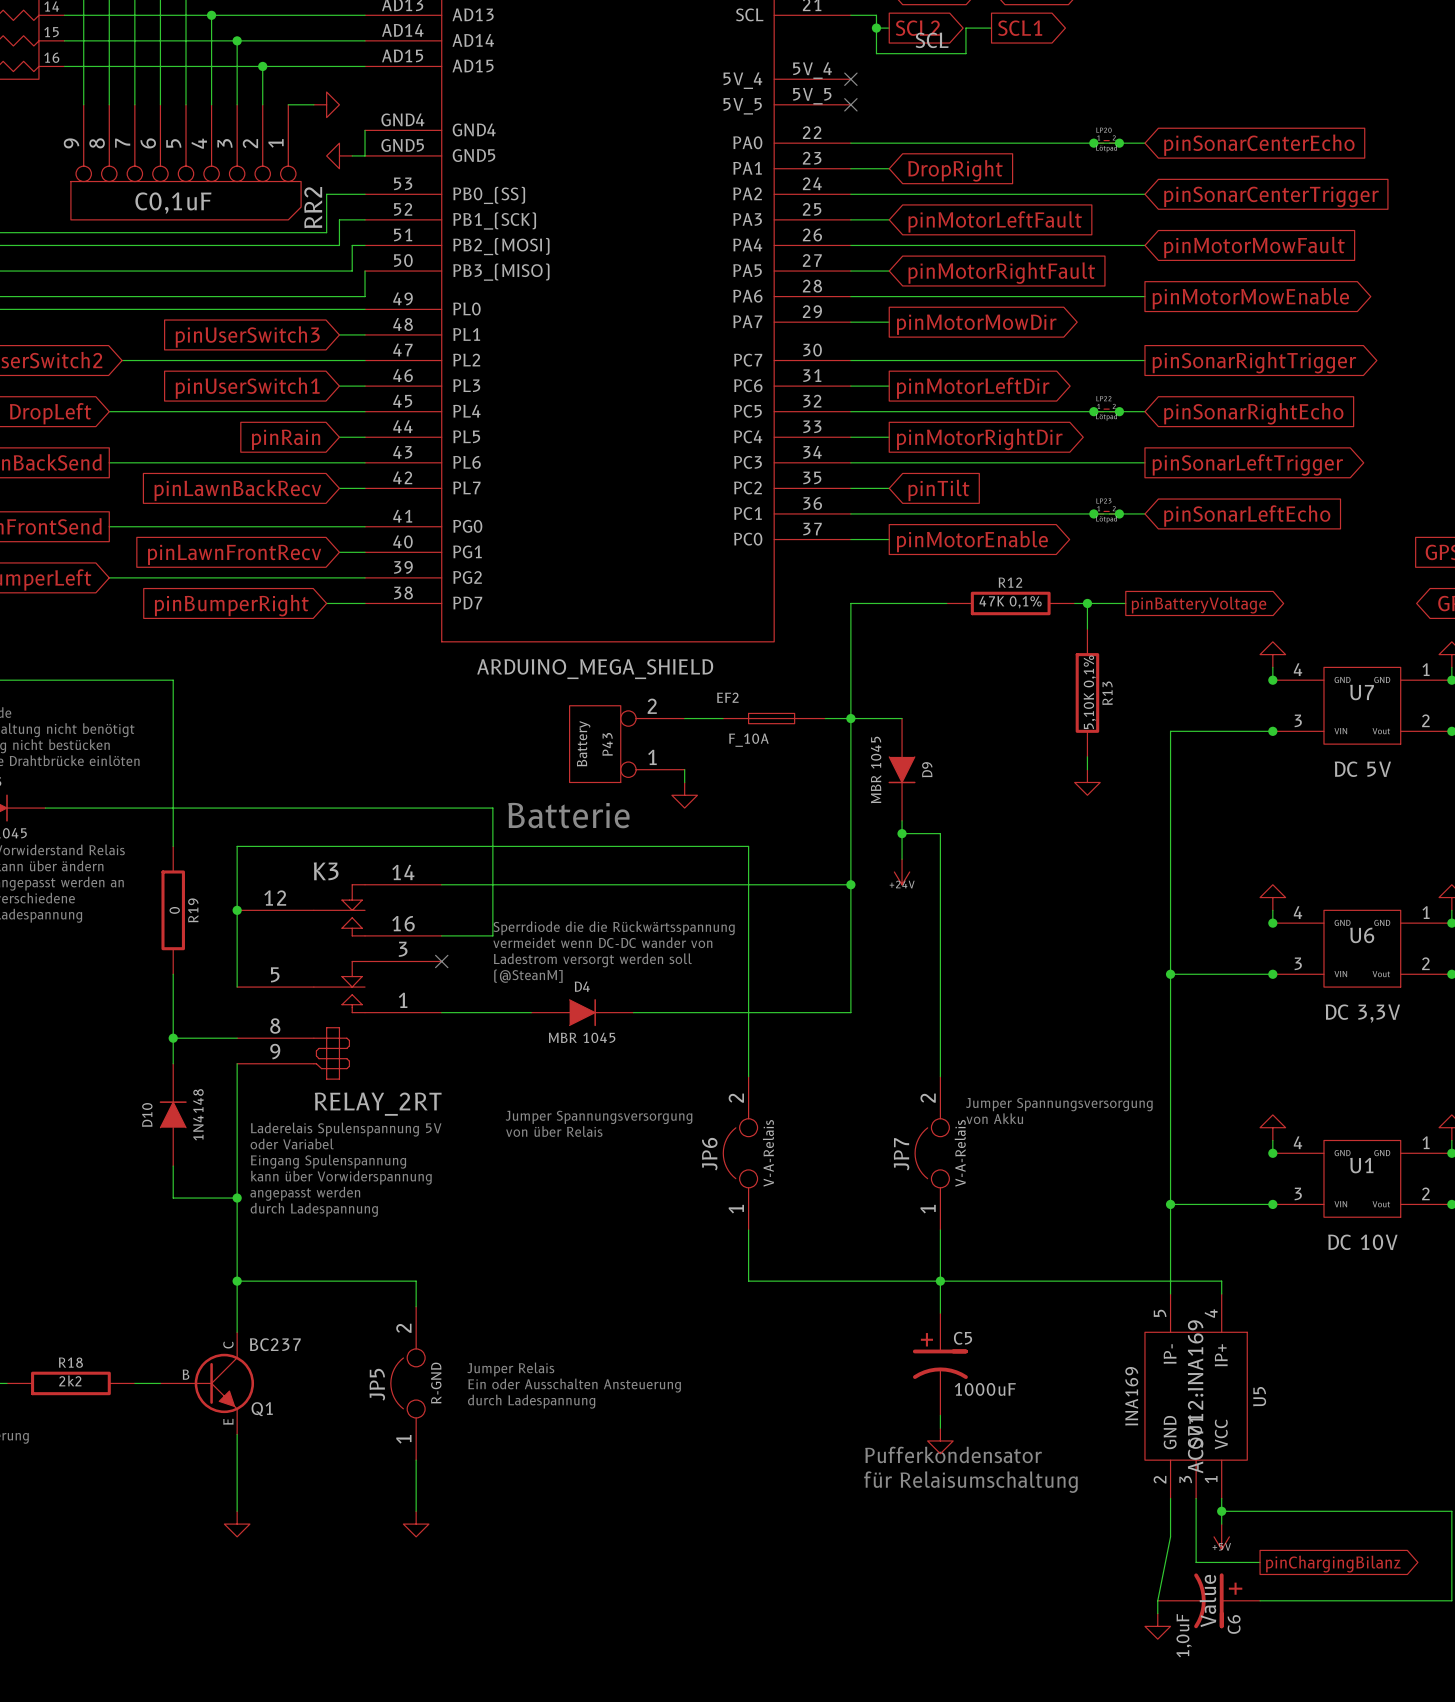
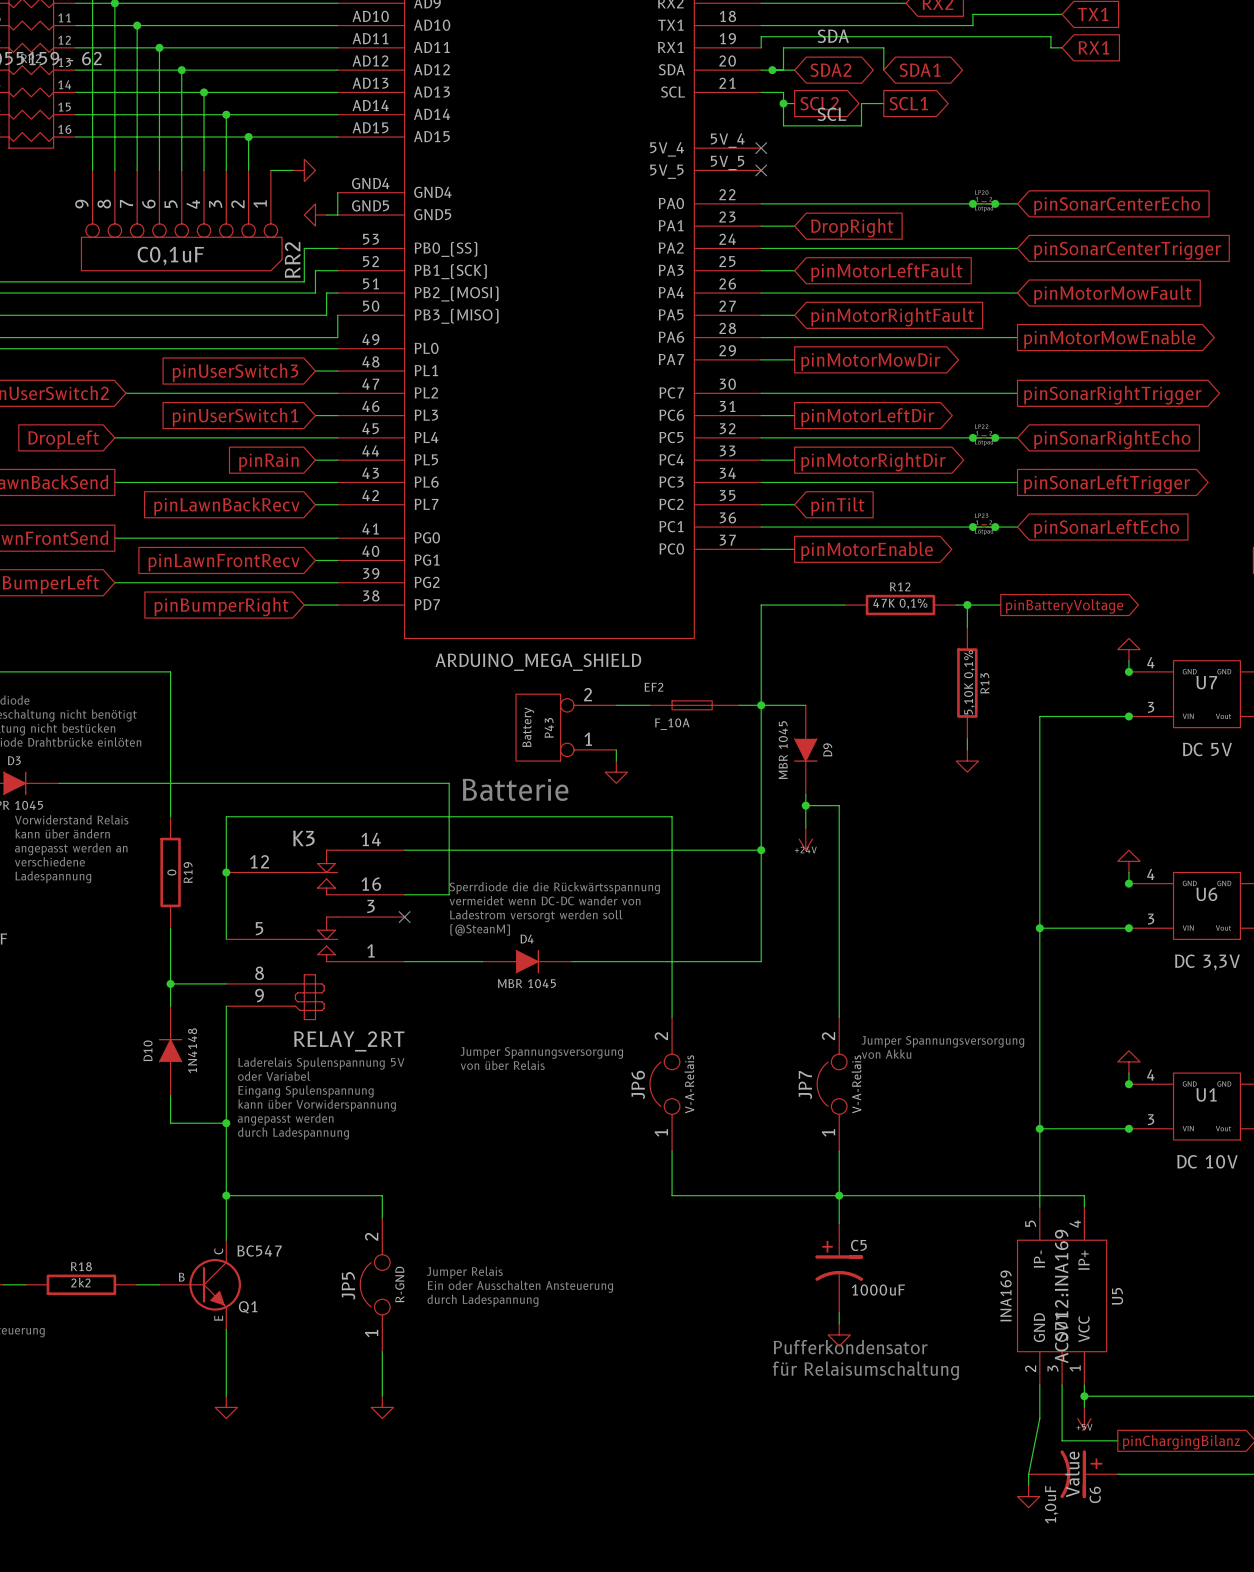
Q1 value: BC237 (275, 1344) -> BC547 (259, 1251)

